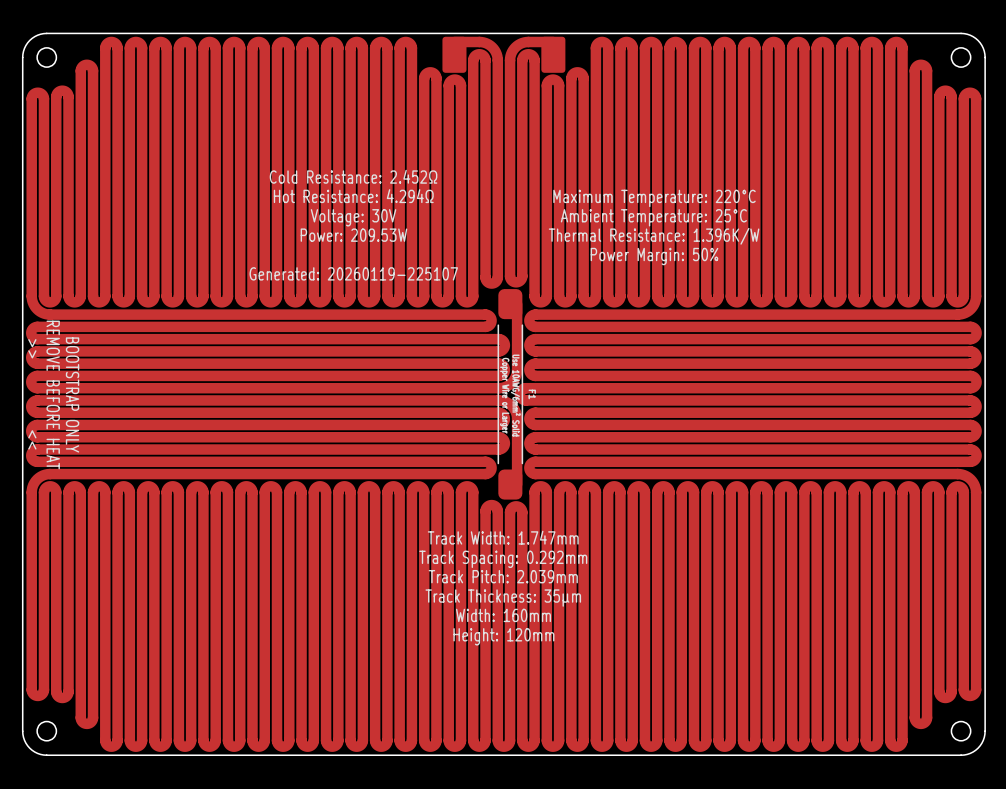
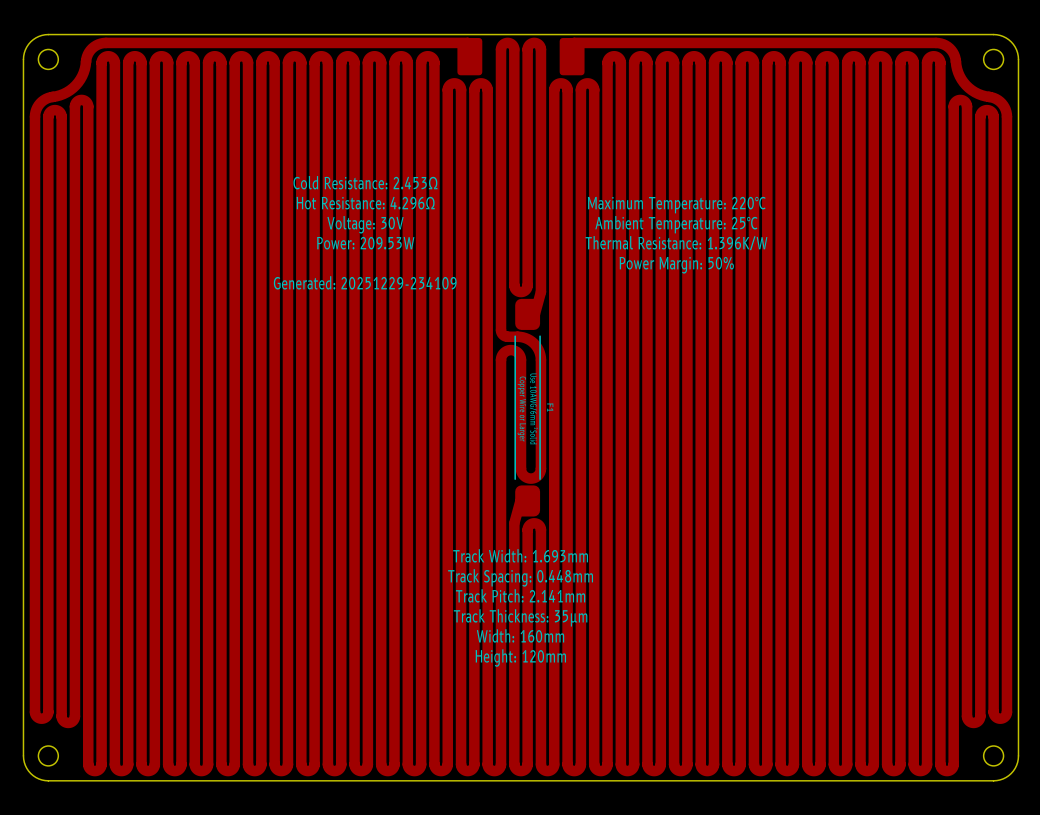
track: (454, 41) (485, 43) (493, 48) (497, 58) (497, 278) (495, 282) (491, 283) (487, 282) (485, 278) (485, 60) (483, 55) (478, 54) (474, 56) (473, 60) (473, 296) (470, 301) (464, 301) (461, 296) (460, 85) (459, 81) (455, 79) (450, 81) (448, 85) (448, 296) (446, 300) (442, 302) (438, 300) (436, 296) (436, 78) (434, 74) (431, 72) (426, 73) (424, 78) (424, 296) (418, 302) (414, 301) (412, 297) (411, 48) (410, 44) (405, 41) (401, 43) (399, 48) (399, 296) (397, 301) (390, 301) (387, 296) (387, 48) (385, 43) (381, 41) (376, 43) (375, 48) (375, 296) (372, 301) (366, 301) (362, 296) (362, 48) (361, 44) (356, 41) (352, 44) (350, 48) (350, 296) (348, 300) (342, 301) (338, 296) (338, 48) (336, 43) (332, 41) (327, 44) (326, 48) (326, 296) (324, 300) (317, 301) (313, 296) (313, 48) (312, 44) (307, 41) (303, 43) (301, 48) (301, 296) (299, 300) (293, 301) (289, 296) (289, 48) (287, 44) (283, 41) (279, 43) (277, 48) (277, 296) (275, 300) (269, 302) (264, 296) (264, 48) (262, 43) (258, 41) (254, 44) (252, 48) (252, 296) (250, 300) (244, 302) (240, 296) (240, 48) (238, 43) (234, 41) (229, 43) (227, 48) (227, 296) (226, 300) (219, 301) (215, 296) (215, 48) (213, 43) (209, 41) (204, 44) (203, 48) (202, 299) (195, 302) (191, 296) (191, 48) (189, 43) (185, 41) (180, 43) (178, 48) (178, 299) (171, 302) (166, 296) (166, 48) (164, 43) (160, 41) (155, 44) (154, 48) (153, 299) (147, 302) (142, 296) (142, 48) (140, 43) (135, 41) (131, 44) (129, 48) (129, 298) (122, 302) (117, 296) (117, 48) (115, 43) (111, 41) (107, 43) (105, 48) (105, 297) (99, 302) (95, 300) (93, 296) (93, 70) (91, 66) (86, 64) (82, 66) (80, 70) (80, 297) (74, 302) (70, 300) (68, 296) (68, 96) (66, 92) (62, 90) (57, 92) (56, 96) (56, 296) (54, 300) (50, 302) (46, 300) (43, 296) (43, 98) (42, 94) (37, 92) (33, 94) (31, 98) (31, 298) (37, 309) (48, 314) (485, 314) (491, 319) (488, 325) (37, 326) (33, 328) (31, 333) (33, 337) (37, 339) (498, 339) (504, 343) (502, 350) (37, 351) (32, 353) (31, 358) (33, 362) (37, 363) (498, 363) (504, 367) (502, 374) (498, 375) (37, 375) (32, 378) (31, 383) (37, 388) (500, 388) (511, 382) (516, 373) (517, 304) -> none
track: (553, 41) (520, 43) (512, 50) (510, 60) (510, 276) (512, 280) (516, 282) (520, 280) (522, 276) (522, 60) (524, 55) (529, 54) (533, 56) (534, 60) (534, 296) (536, 300) (539, 302) (544, 300) (546, 296) (546, 85) (548, 81) (552, 79) (556, 80) (559, 85) (559, 296) (561, 300) (565, 302) (569, 300) (571, 296) (571, 78) (572, 74) (576, 72) (581, 73) (583, 78) (583, 296) (589, 302) (593, 301) (595, 297) (595, 48) (599, 42) (605, 43) (608, 48) (608, 296) (609, 300) (613, 302) (618, 300) (620, 296) (620, 48) (623, 42) (629, 42) (632, 48) (632, 296) (634, 300) (638, 302) (642, 300) (644, 296) (644, 48) (647, 43) (653, 42) (657, 48) (657, 296) (658, 300) (662, 302) (667, 300) (669, 296) (669, 48) (672, 43) (678, 42) (681, 48) (681, 296) (683, 300) (687, 302) (691, 300) (694, 296) (694, 48) (696, 43) (703, 42) (706, 48) (706, 296) (710, 302) (715, 301) (718, 296) (718, 48) (720, 43) (727, 42) (730, 48) (730, 296) (735, 302) (740, 301) (743, 296) (743, 48) (745, 43) (751, 42) (755, 48) (755, 296) (760, 302) (764, 301) (767, 296) (767, 48) (769, 43) (776, 42) (779, 48) (779, 296) (784, 302) (789, 301) (792, 296) (792, 48) (793, 43) (800, 42) (804, 48) (804, 296) (809, 302) (814, 300) (816, 296) (817, 44) (825, 42) (828, 48) (828, 296) (832, 301) (838, 301) (841, 296) (842, 44) (849, 42) (853, 48) (853, 296) (857, 301) (863, 301) (865, 296) (866, 45) (873, 42) (877, 48) (877, 296) (881, 301) (886, 301) (890, 296) (890, 45) (897, 42) (902, 48) (902, 296) (906, 301) (912, 301) (914, 296) (915, 68) (922, 64) (927, 70) (927, 296) (931, 302) (936, 301) (939, 296) (939, 95) (945, 90) (949, 92) (951, 96) (951, 296) (953, 300) (957, 302) (961, 300) (963, 296) (963, 98) (968, 92) (975, 95) (976, 296) (973, 306) (965, 312) (957, 314) (535, 314) (531, 316) (529, 320) (531, 325) (535, 326) (971, 326) (975, 329) (976, 333) (974, 337) (970, 339) (535, 339) (531, 340) (529, 345) (531, 349) (535, 351) (970, 351) (974, 353) (976, 357) (975, 361) (971, 363) (535, 363) (531, 365) (529, 369) (531, 374) (535, 375) (970, 375) (976, 379) (973, 387) (526, 388) (521, 389) (520, 394) (521, 398) (526, 400) (973, 401) (976, 408) (970, 412) (535, 412) (531, 414) (529, 418) (530, 422) (535, 424) (971, 425) (975, 427) (976, 431) (974, 435) (970, 437) (535, 437) (531, 439) (529, 443) (531, 447) (535, 449) (970, 449) (974, 451) (976, 454) (975, 459) (971, 461) (535, 461) (531, 463) (529, 467) (531, 472) (535, 474) (957, 474) (965, 475) (973, 482) (976, 492) (976, 689) (974, 693) (967, 695) (963, 690) (963, 492) (962, 488) (957, 486) (953, 488) (951, 492) (951, 691) (949, 696) (946, 697) (941, 696) (939, 691) (939, 491) (936, 487) (933, 486) (929, 487) (927, 491) (927, 717) (925, 721) (921, 723) (916, 722) (914, 717) (914, 491) (912, 487) (908, 486) (902, 490) (902, 740) (897, 746) (892, 745) (890, 740) (890, 492) (888, 488) (884, 486) (879, 488) (877, 492) (877, 740) (873, 746) (868, 745) (865, 740) (865, 492) (863, 488) (859, 486) (855, 488) (853, 492) (853, 740) (848, 746) (843, 745) (841, 740) (841, 492) (839, 488) (835, 486) (830, 488) (828, 492) (828, 740) (824, 746) (819, 745) (816, 740) (816, 492) (815, 488) (811, 486) (806, 487) (804, 492) (804, 740) (799, 746) (794, 745) (792, 740) (792, 492) (790, 488) (786, 486) (781, 487) (779, 492) (779, 740) (775, 746) (770, 745) (767, 740) (767, 492) (766, 488) (762, 486) (757, 487) (755, 492) (755, 740) (750, 746) (745, 745) (743, 740) (743, 492) (741, 488) (737, 486) (732, 487) (730, 492) (730, 740) (726, 746) (720, 745) (718, 740) (718, 492) (717, 488) (713, 486) (708, 487) (706, 492) (706, 740) (701, 746) (696, 745) (694, 740) (694, 492) (692, 488) (688, 486) (683, 487) (681, 492) (681, 740) (677, 746) (671, 745) (669, 740) (669, 492) (668, 488) (664, 486) (659, 488) (657, 492) (657, 740) (652, 746) (647, 745) (644, 740) (644, 492) (643, 488) (639, 486) (635, 487) (632, 492) (632, 740) (628, 746) (622, 745) (620, 740) (620, 492) (618, 488) (615, 486) (610, 487) (608, 492) (608, 740) (604, 746) (598, 745) (595, 740) (595, 492) (594, 488) (590, 486) (585, 487) (583, 492) (583, 740) (579, 746) (573, 745) (571, 740) (571, 492) (569, 488) (565, 486) (561, 487) (559, 492) (559, 740) (555, 746) (549, 745) (546, 740) (546, 492) (545, 488) (541, 486) (536, 487) (534, 492) (534, 740) (530, 746) (525, 745) (522, 740) (522, 512) (520, 508) (516, 506) (512, 507) (510, 512) (509, 741) (507, 745) (503, 746) (500, 745) (497, 741) (497, 511) (495, 506) (491, 505) (487, 506) (485, 511) (485, 741) (483, 744) (479, 746) (473, 742) (473, 492) (471, 488) (467, 486) (463, 487) (460, 492) (460, 740) (457, 746) (451, 745) (448, 740) (448, 492) (447, 488) (443, 486) (438, 487) (436, 492) (436, 740) (433, 745) (427, 745) (424, 740) (424, 492) (422, 488) (418, 486) (414, 487) (411, 492) (411, 740) (408, 745) (402, 745) (399, 740) (399, 492) (398, 488) (394, 486) (389, 487) (387, 492) (387, 740) (384, 745) (378, 745) (375, 740) (375, 492) (373, 488) (369, 486) (364, 487) (362, 492) (362, 740) (359, 745) (353, 745) (350, 740) (350, 492) (348, 488) (345, 486) (340, 487) (338, 492) (338, 740) (335, 745) (329, 745) (326, 740) (326, 492) (324, 488) (320, 486) (315, 488) (313, 492) (313, 740) (311, 745) (304, 745) (301, 740) (301, 492) (299, 488) (296, 486) (291, 487) (289, 492) (289, 740) (286, 745) (280, 746) (277, 740) (277, 492) (272, 486) (267, 487) (264, 492) (264, 740) (262, 745) (256, 746) (252, 740) (252, 492) (247, 486) (242, 487) (240, 492) (240, 740) (238, 744) (231, 746) (227, 740) (227, 492) (223, 486) (218, 487) (215, 492) (215, 740) (213, 744) (207, 746) (203, 740) (203, 492) (198, 486) (193, 487) (191, 492) (189, 744) (183, 746) (178, 740) (178, 492) (174, 486) (169, 487) (166, 492) (165, 744) (158, 746) (154, 740) (154, 492) (150, 486) (144, 487) (142, 492) (141, 743) (134, 746) (129, 740) (129, 492) (126, 486) (120, 487) (117, 492) (116, 743) (109, 746) (105, 740) (105, 492) (101, 486) (95, 487) (93, 492) (92, 720) (85, 723) (80, 718) (80, 492) (76, 486) (70, 487) (68, 492) (68, 693) (65, 696) (61, 697) (56, 692) (56, 492) (54, 488) (50, 486) (45, 488) (43, 492) (43, 690) (38, 695) (32, 692) (31, 492) (34, 483) (43, 475) (485, 474) (489, 472) (491, 467) (490, 463) (485, 461) (37, 461) (31, 457) (34, 450) (498, 449) (503, 447) (504, 443) (503, 439) (498, 437) (36, 437) (32, 434) (31, 431) (33, 426) (37, 424) (498, 424) (503, 423) (504, 418) (503, 414) (498, 412) (37, 412) (33, 410) (31, 407) (35, 400) (502, 400) (511, 405) (516, 414) (517, 484) -> none
track: none -> (467, 56) (467, 42) (103, 43) (94, 46) (89, 52) (83, 72) (75, 85) (63, 93) (45, 99) (38, 105) (35, 116) (35, 712) (36, 716) (44, 718) (48, 712) (48, 116) (50, 111) (54, 110) (59, 112) (61, 116) (61, 716) (63, 720) (67, 722) (72, 721) (74, 717) (74, 106) (77, 101) (82, 100) (86, 102) (88, 106) (88, 764) (92, 770) (99, 768) (101, 764) (101, 62) (104, 57) (111, 57) (114, 62) (114, 764) (117, 769) (124, 770) (128, 764) (128, 62) (129, 58) (137, 56) (141, 62) (141, 764) (144, 769) (151, 770) (154, 764) (156, 58) (163, 56) (168, 62) (168, 764) (171, 769) (177, 770) (181, 764) (182, 59) (190, 56) (194, 62) (194, 764) (197, 769) (204, 770) (208, 764) (208, 62) (209, 58) (217, 56) (221, 62) (221, 764) (224, 770) (231, 770) (234, 764) (234, 62) (236, 58) (243, 56) (248, 62) (248, 764) (250, 769) (257, 770) (261, 764) (261, 62) (263, 58) (270, 56) (274, 62) (274, 764) (277, 770) (284, 770) (287, 764) (287, 62) (289, 58) (297, 56) (301, 62) (301, 764) (305, 770) (311, 770) (314, 764) (314, 62) (316, 57) (324, 57) (327, 62) (327, 764) (332, 770) (338, 769) (341, 764) (341, 62) (343, 57) (350, 56) (354, 62) (354, 764) (358, 770) (364, 769) (367, 764) (367, 62) (371, 57) (377, 57) (381, 62) (381, 764) (386, 770) (391, 769) (394, 764) (394, 62) (398, 57) (404, 57) (407, 62) (407, 764) (412, 770) (418, 769) (421, 764) (421, 62) (425, 56) (431, 57) (434, 62) (434, 764) (435, 768) (440, 770) (445, 769) (447, 764) (447, 90) (452, 83) (458, 85) (461, 90) (461, 764) (466, 770) (471, 769) (474, 764) (474, 90) (476, 85) (480, 83) (485, 85) (487, 90) (487, 764) (489, 768) (493, 771) (498, 769) (501, 764) (501, 360) (502, 354) (508, 350) (516, 351) (520, 358) (521, 471) (525, 476) (532, 478) (537, 476) (540, 469) (540, 354) (535, 345) (530, 340) (520, 336) (505, 336) (501, 330) (501, 49) (502, 45) (506, 42) (512, 44) (514, 49) (514, 285) (516, 290) (520, 291) (525, 290) (527, 285) (527, 48) (529, 44) (534, 42) (538, 44) (540, 48) (540, 292) (534, 314) (527, 314)
track: none -> (574, 56) (574, 42) (938, 43) (947, 46) (952, 52) (958, 72) (966, 85) (978, 93) (996, 99) (1003, 105) (1006, 116) (1006, 714) (1002, 718) (998, 718) (993, 712) (993, 116) (991, 112) (986, 110) (982, 111) (980, 116) (980, 716) (978, 720) (974, 722) (969, 721) (967, 717) (967, 106) (964, 101) (959, 100) (955, 102) (953, 106) (953, 764) (948, 770) (941, 768) (940, 62) (936, 56) (929, 57) (927, 62) (927, 764) (925, 769) (917, 770) (913, 764) (913, 62) (910, 57) (904, 57) (900, 62) (899, 768) (892, 770) (887, 764) (887, 62) (884, 57) (877, 57) (873, 62) (873, 764) (872, 768) (864, 770) (860, 764) (860, 62) (857, 57) (850, 57) (847, 62) (847, 764) (845, 768) (838, 770) (833, 764) (833, 62) (831, 57) (824, 56) (820, 62) (820, 764) (818, 769) (811, 770) (807, 764) (807, 62) (803, 57) (797, 57) (793, 62) (793, 764) (791, 769) (784, 770) (780, 764) (780, 62) (777, 57) (770, 57) (767, 62) (767, 764) (765, 769) (758, 770) (753, 764) (753, 62) (750, 57) (743, 57) (740, 62) (740, 764) (737, 769) (730, 770) (727, 764) (727, 62) (723, 56) (717, 57) (714, 62) (714, 764) (711, 769) (704, 770) (700, 764) (700, 62) (696, 56) (690, 57) (687, 62) (687, 764) (683, 770) (677, 770) (674, 764) (674, 62) (669, 56) (663, 57) (660, 62) (660, 764) (656, 770) (650, 770) (647, 764) (647, 62) (642, 56) (637, 57) (634, 62) (634, 764) (629, 770) (623, 769) (620, 764) (620, 62) (615, 56) (609, 57) (607, 62) (607, 764) (602, 770) (596, 769) (594, 764) (594, 90) (592, 85) (588, 83) (583, 85) (580, 90) (580, 764) (579, 768) (575, 771) (569, 769) (567, 764) (567, 90) (566, 85) (561, 83) (556, 84) (554, 90) (554, 764) (552, 768) (548, 771) (543, 769) (540, 764) (540, 529) (539, 525) (535, 523) (529, 525) (527, 529) (527, 765) (525, 769) (520, 771) (516, 769) (514, 765) (514, 523) (520, 500) (527, 500)
text: Cold Resistance: 2.452Ω (353, 176) -> Cold Resistance: 2.453Ω (365, 182)
text: Hot Resistance: 4.294Ω (353, 196) -> Hot Resistance: 4.296Ω (365, 203)
text: Generated: 20260119-225107 (353, 273) -> Generated: 20251229-234109 (365, 282)
text: >> << (32, 394) -> none
text: REMOVE BEFORE HEAT (53, 394) -> none
text: BOOTSTRAP ONLY (72, 394) -> none
text: Track Width: 1.747mm (503, 537) -> Track Width: 1.693mm (520, 555)
text: Track Spacing: 0.292mm (503, 559) -> Track Spacing: 0.448mm (520, 577)
text: Track Pitch: 2.039mm (503, 576) -> Track Pitch: 2.141mm (520, 595)

